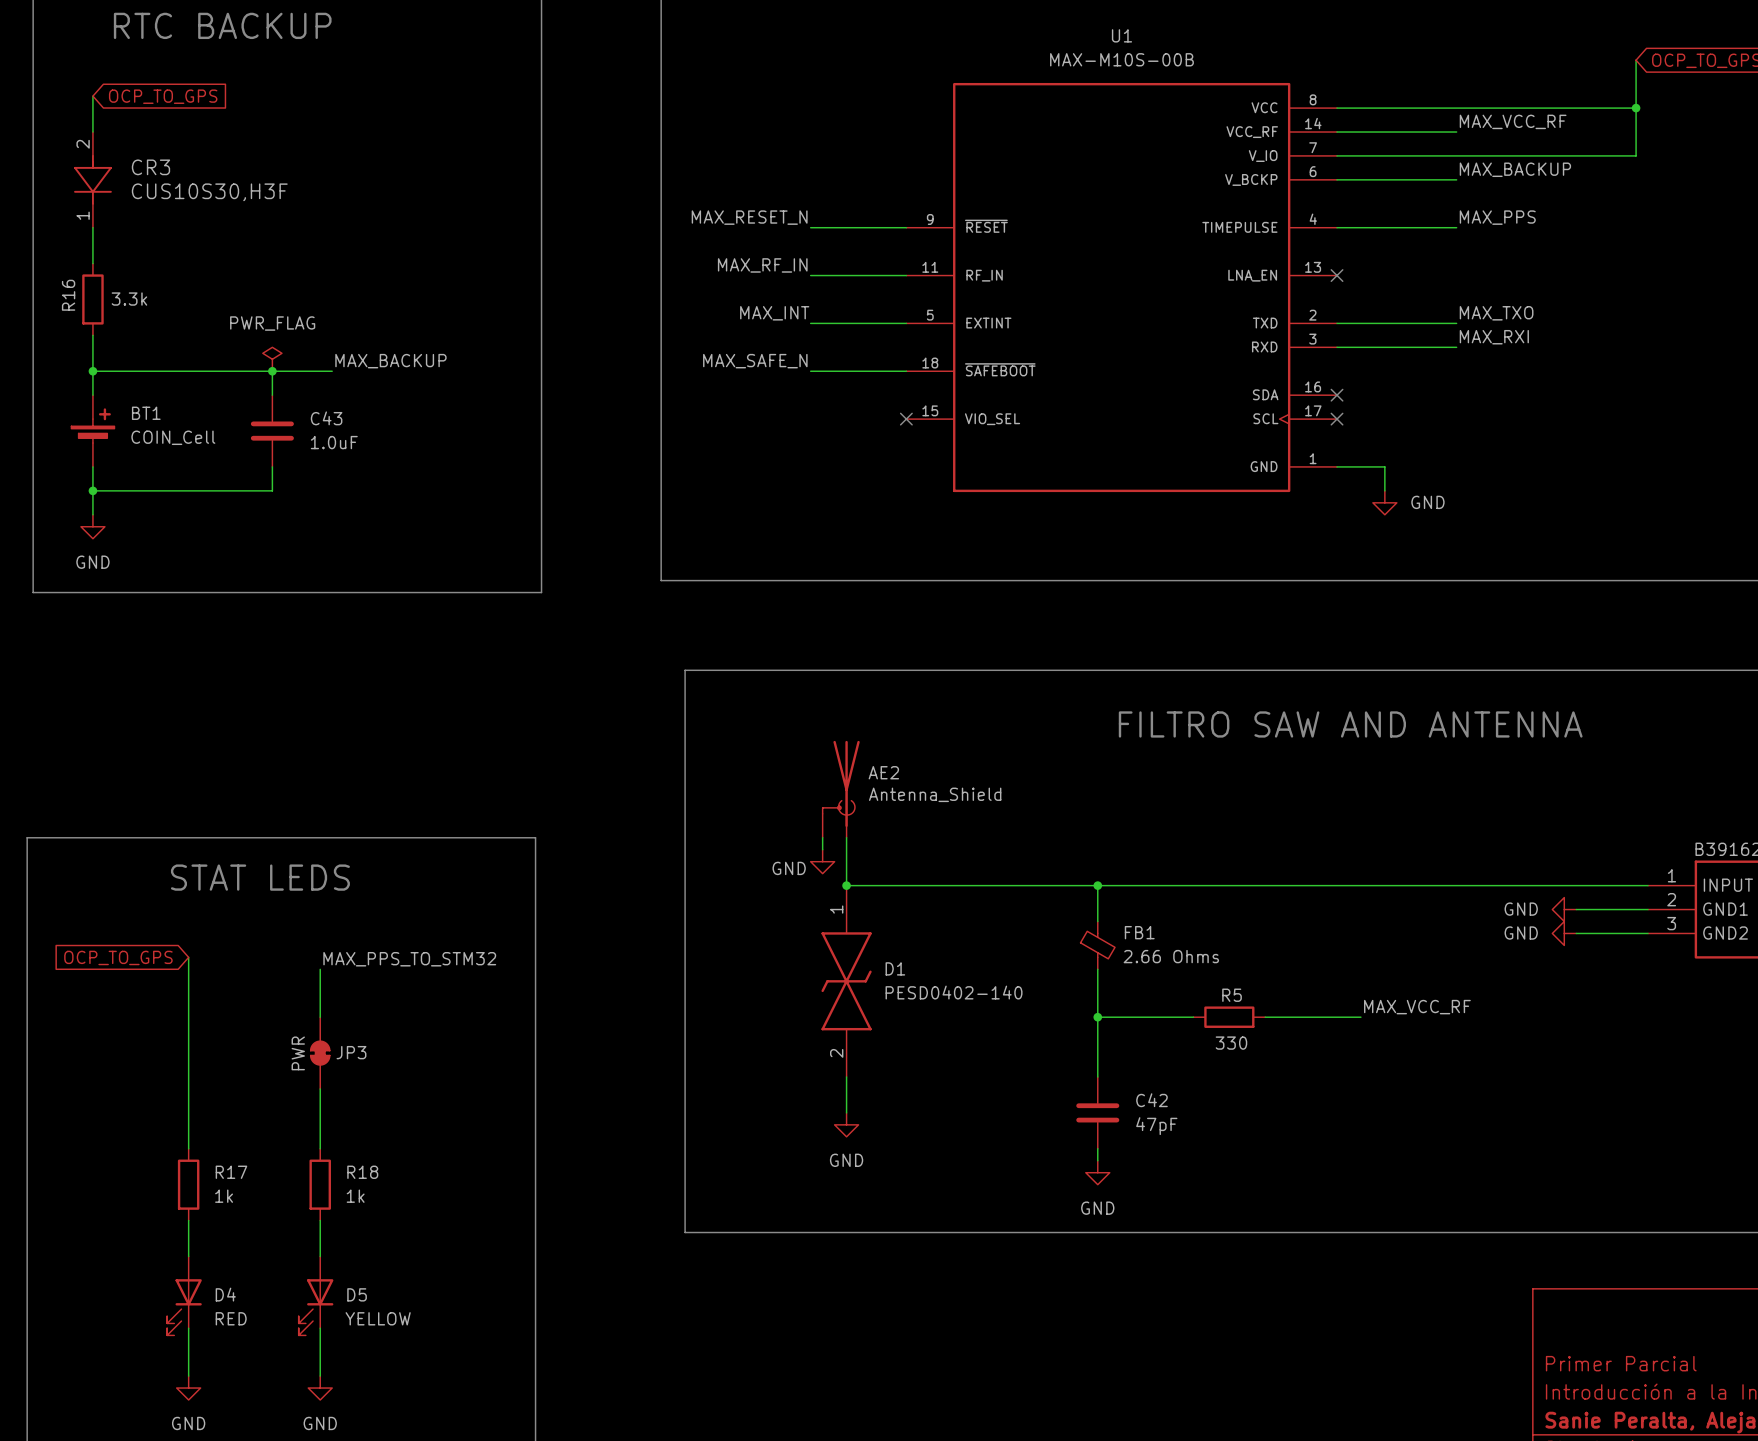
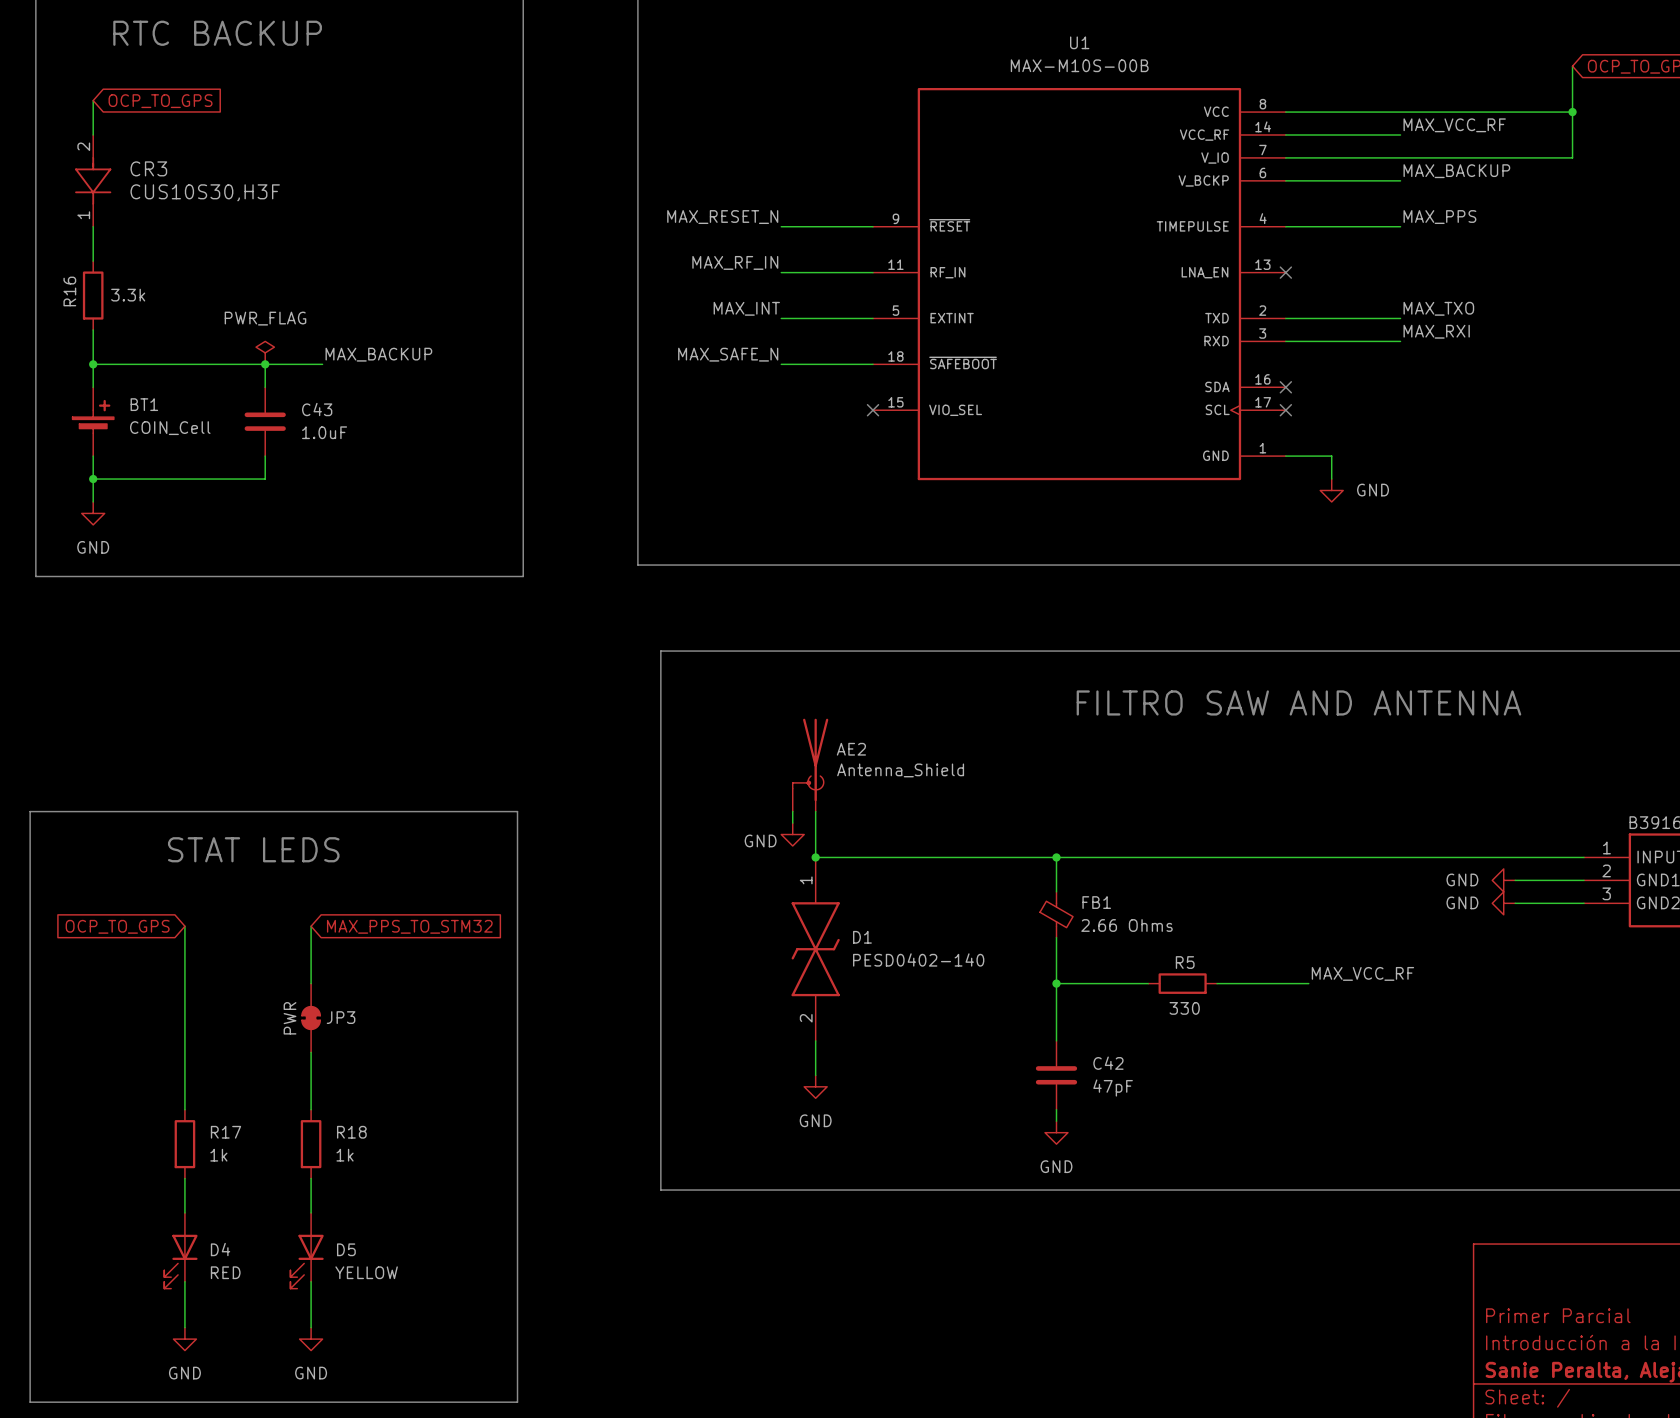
wire: none -> (311, 926) (311, 937)
global label: none -> MAX_PPS_TO_STM32 (409, 926)
label: MAX_PPS_TO_STM32 (409, 959) -> none

